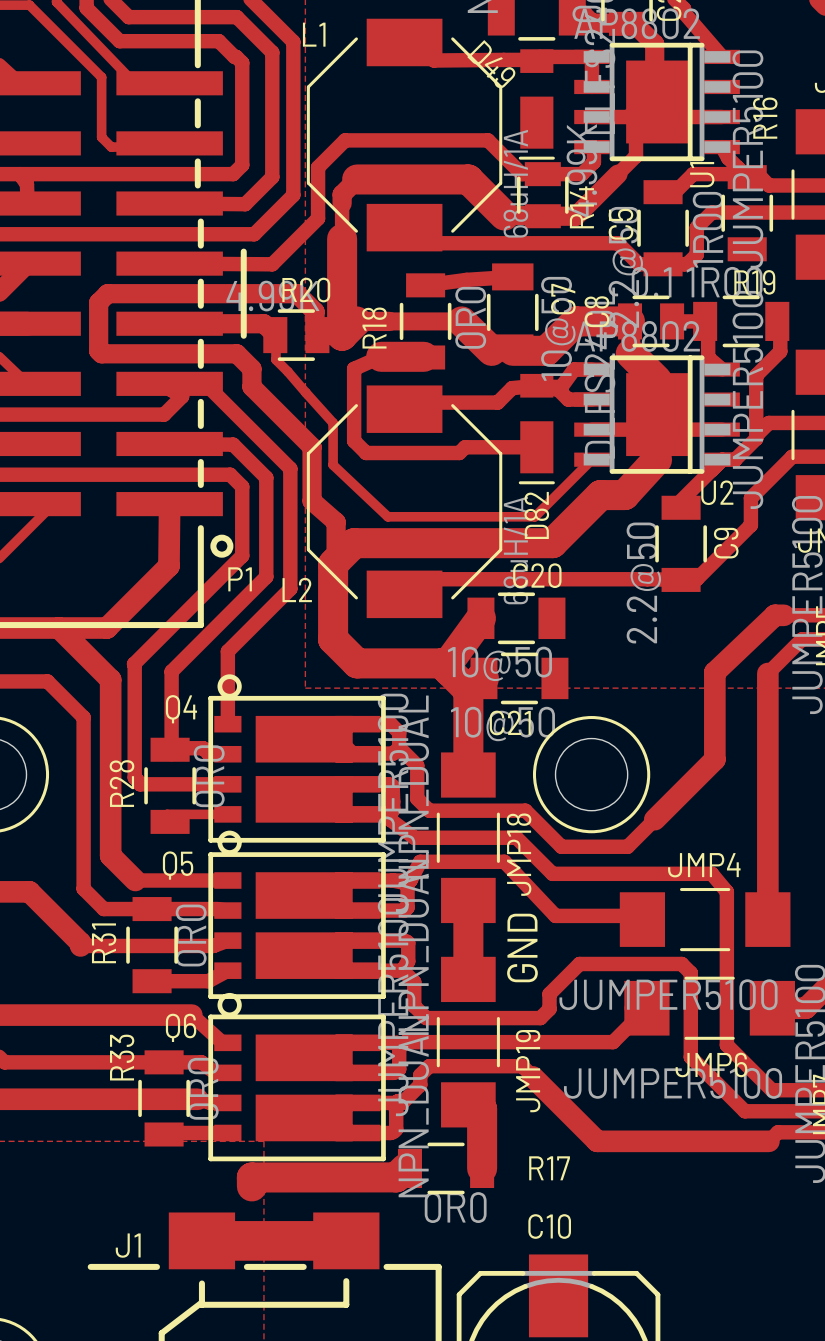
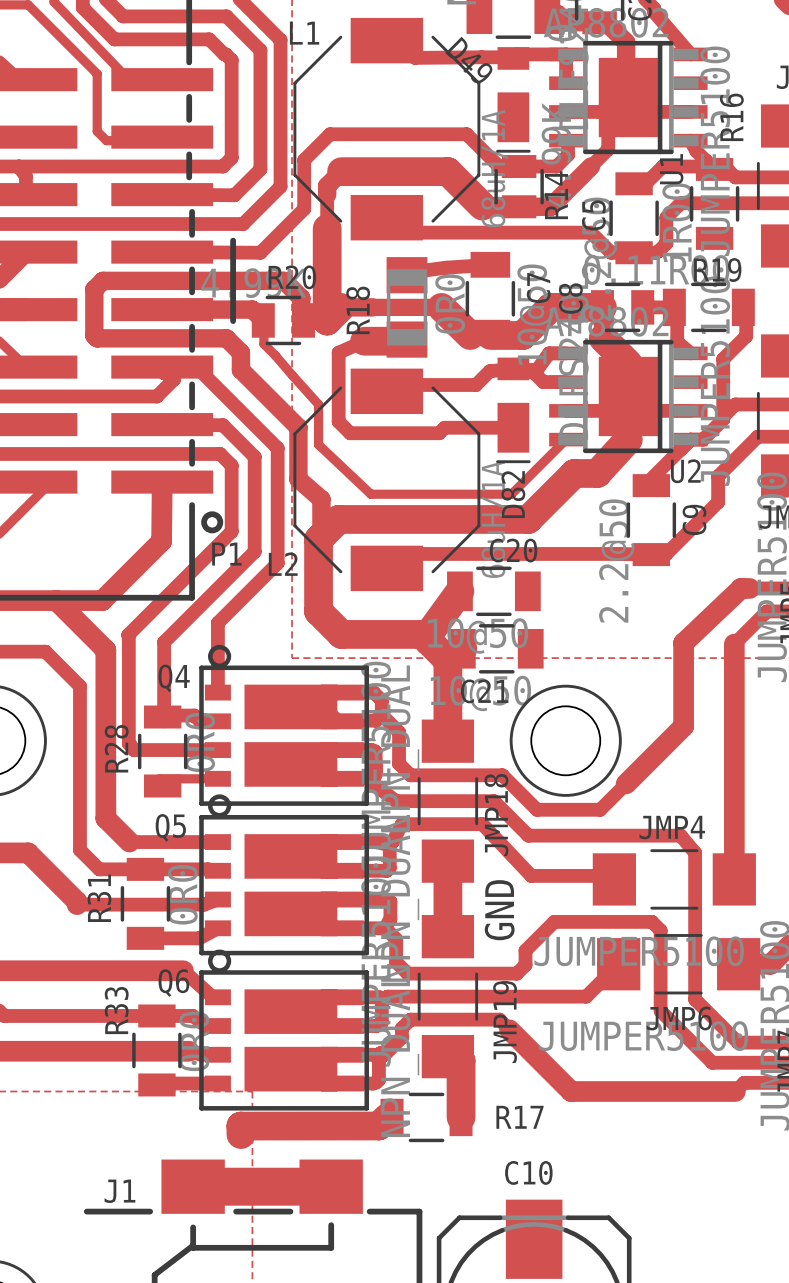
R18 footprint: [399, 273, 452, 370] -> [386, 257, 428, 358]
R17 value: 0R0 (455, 1207) -> none

